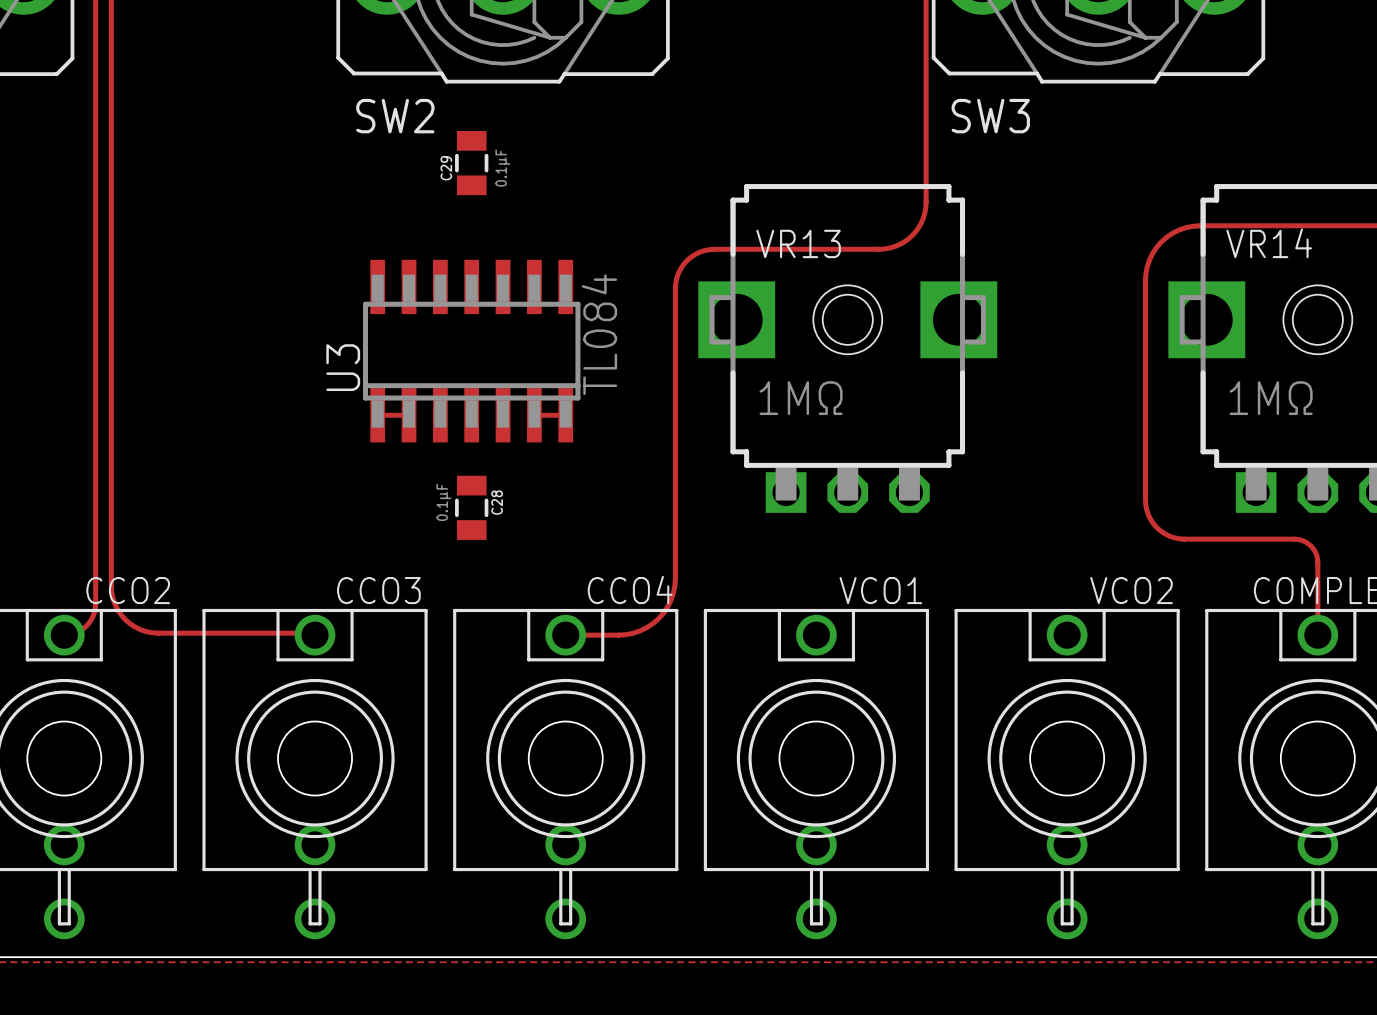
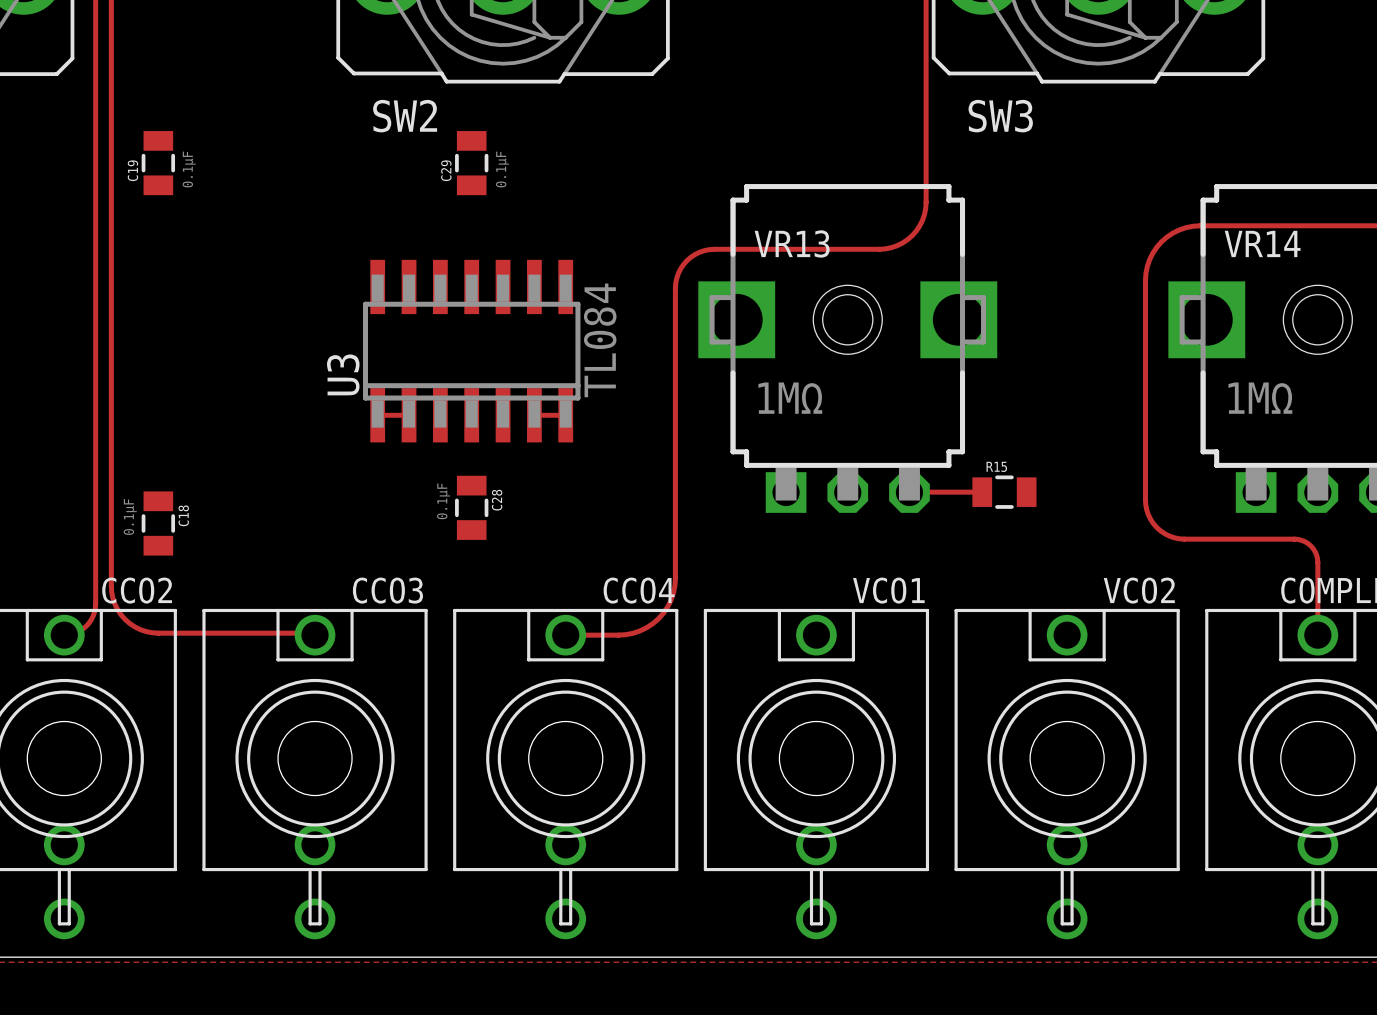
C19: none -> 0.1µF (158, 163)
track: none -> (982, 492) (909, 492)
R15: none -> (1004, 492)
C18: none -> 0.1µF (158, 523)

